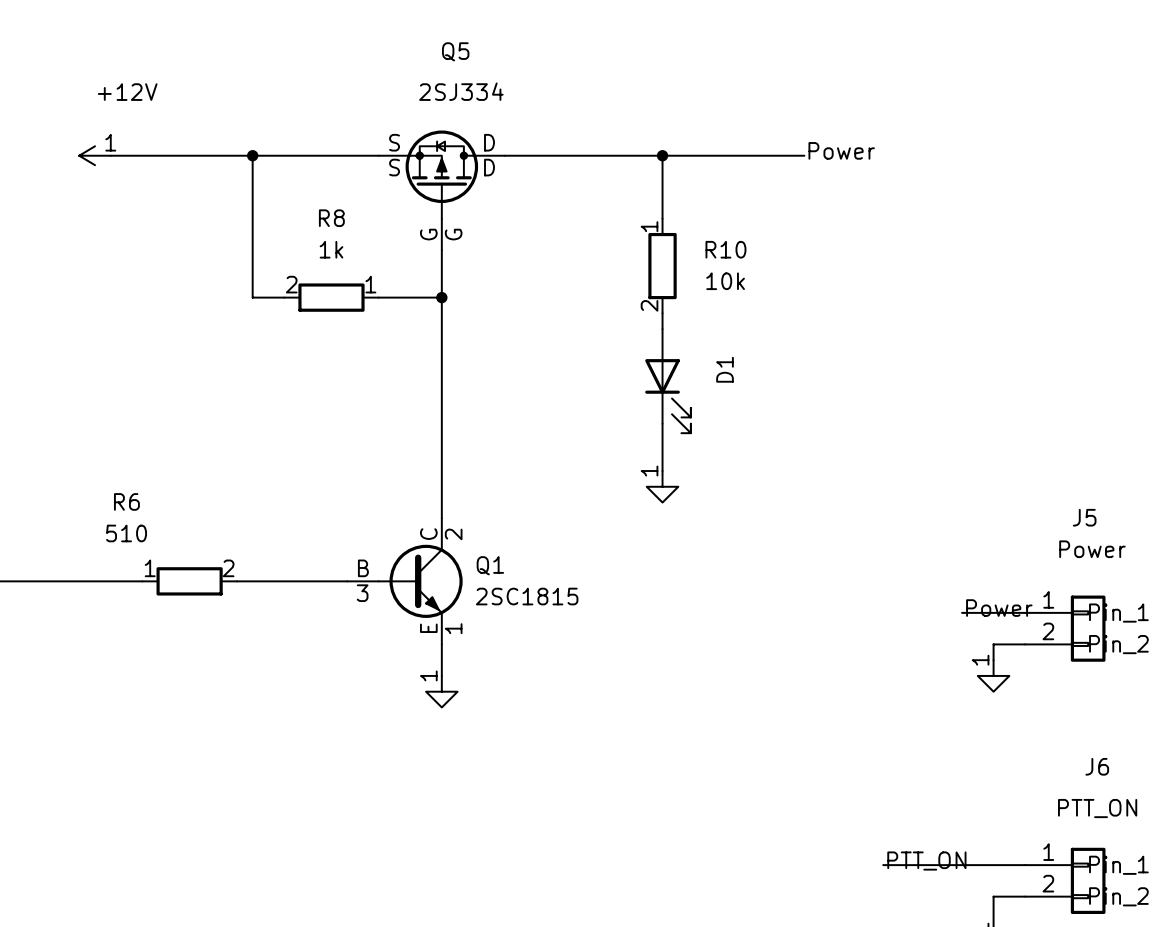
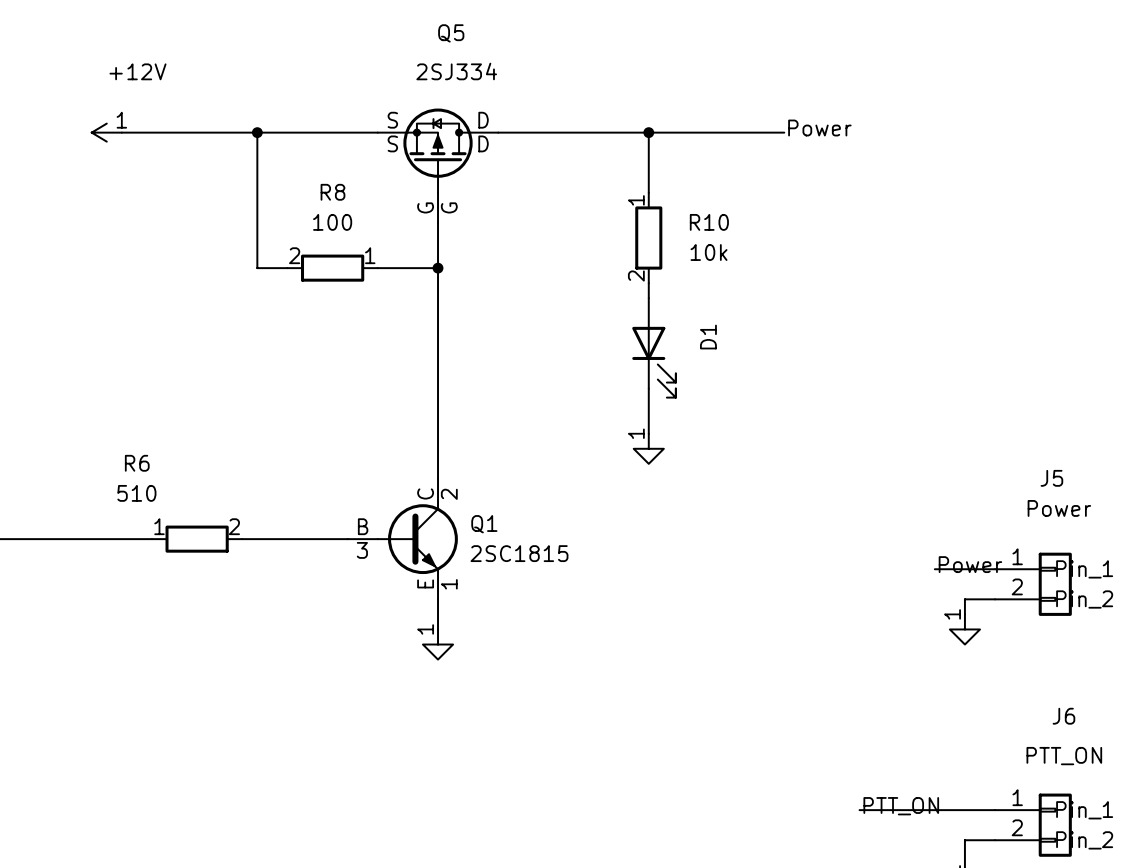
R8 value: 1k (331, 249) -> 100 (332, 222)

